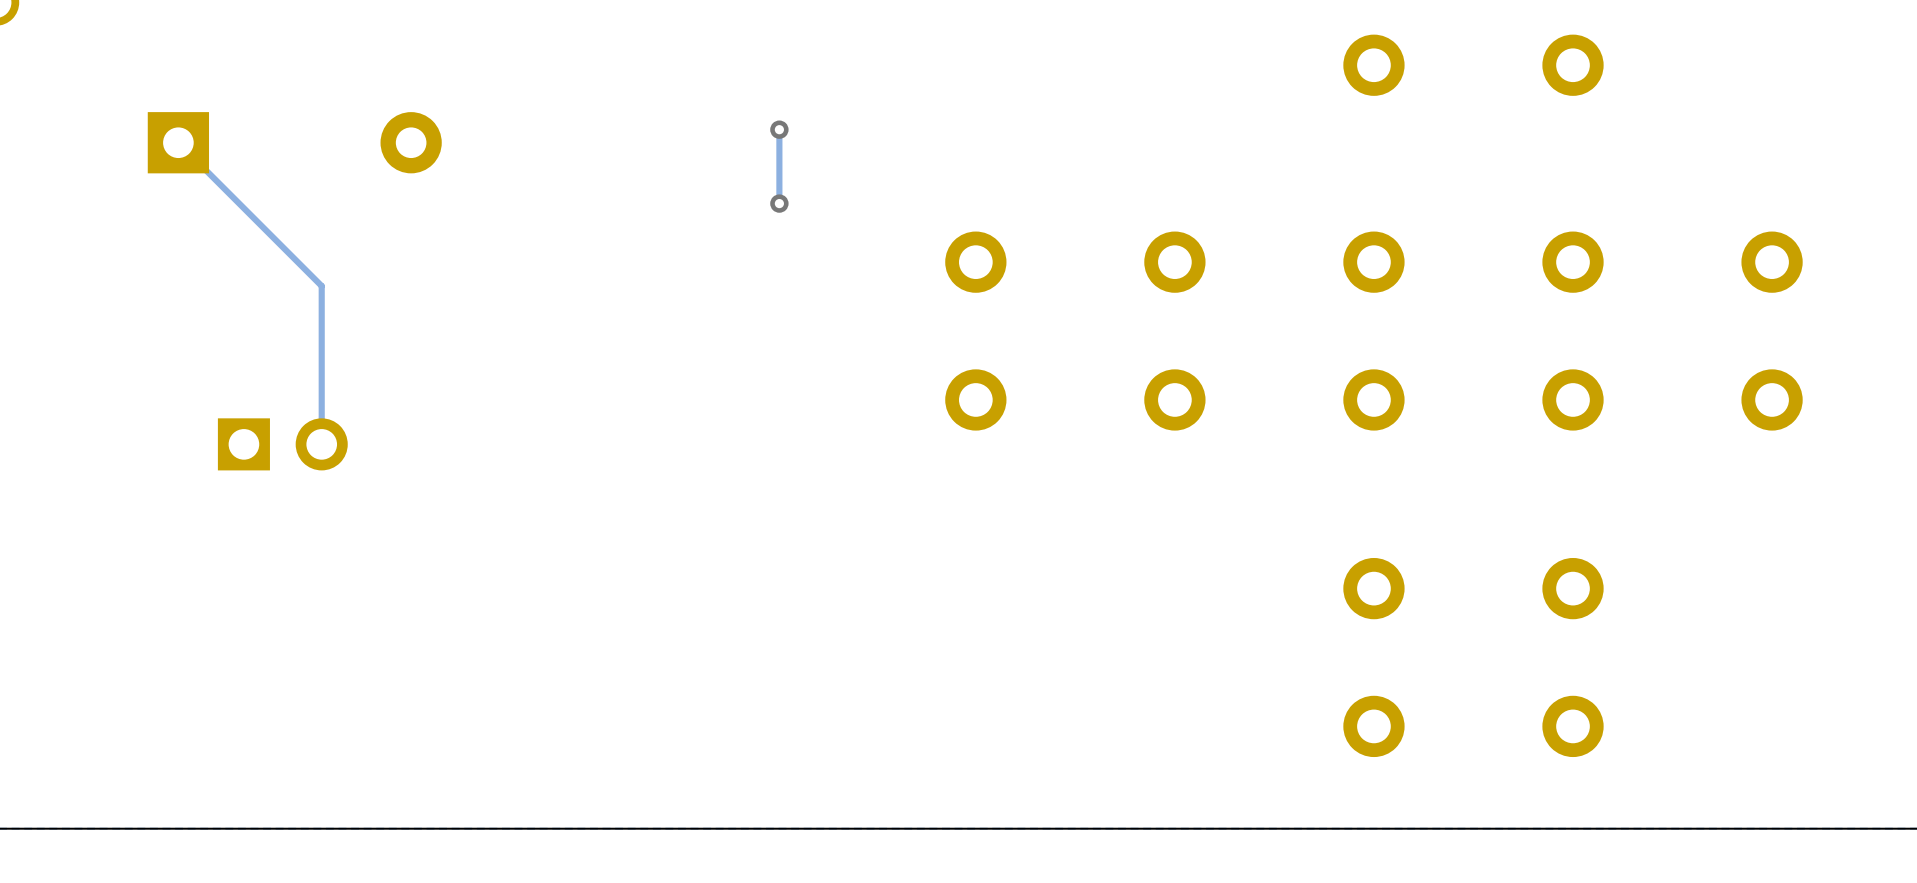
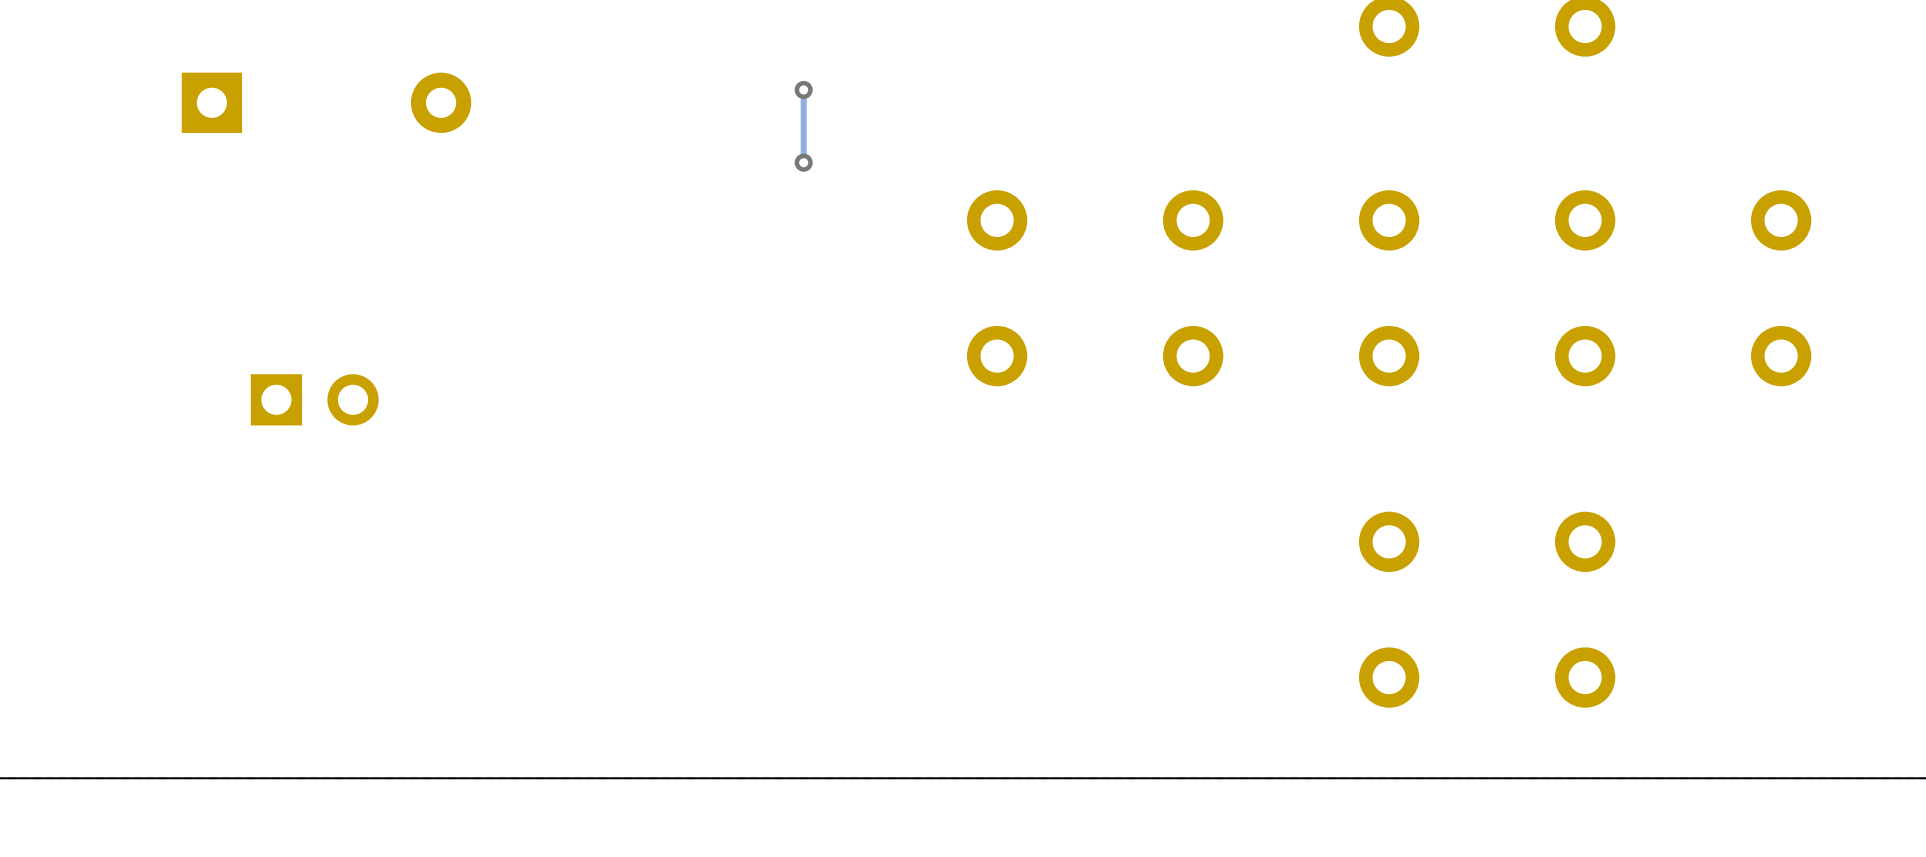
track: (178, 142) (321, 286) (321, 444) -> none

